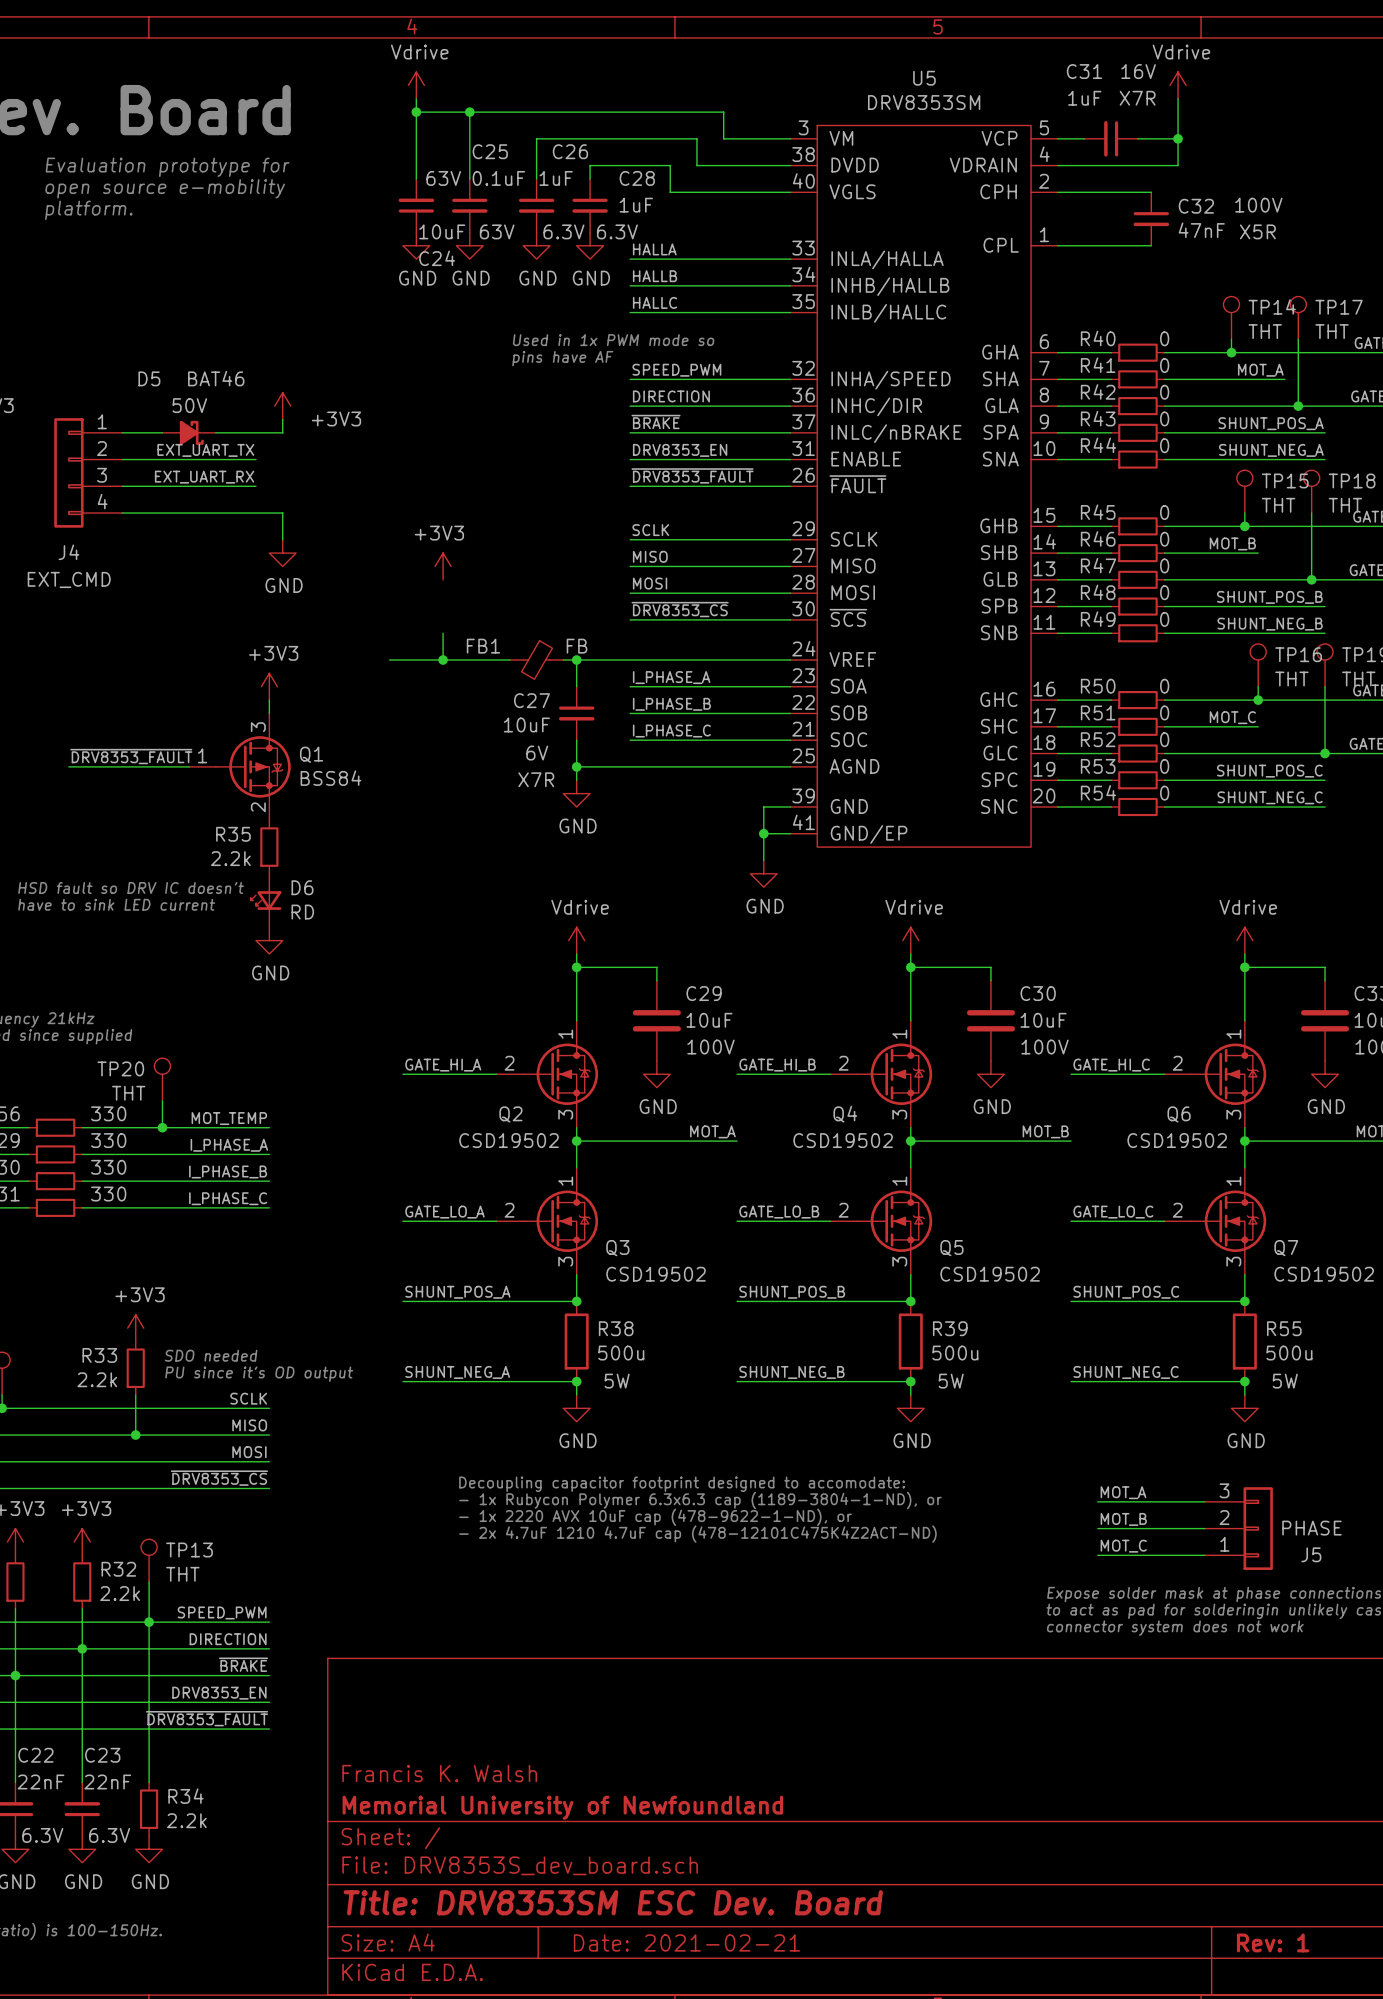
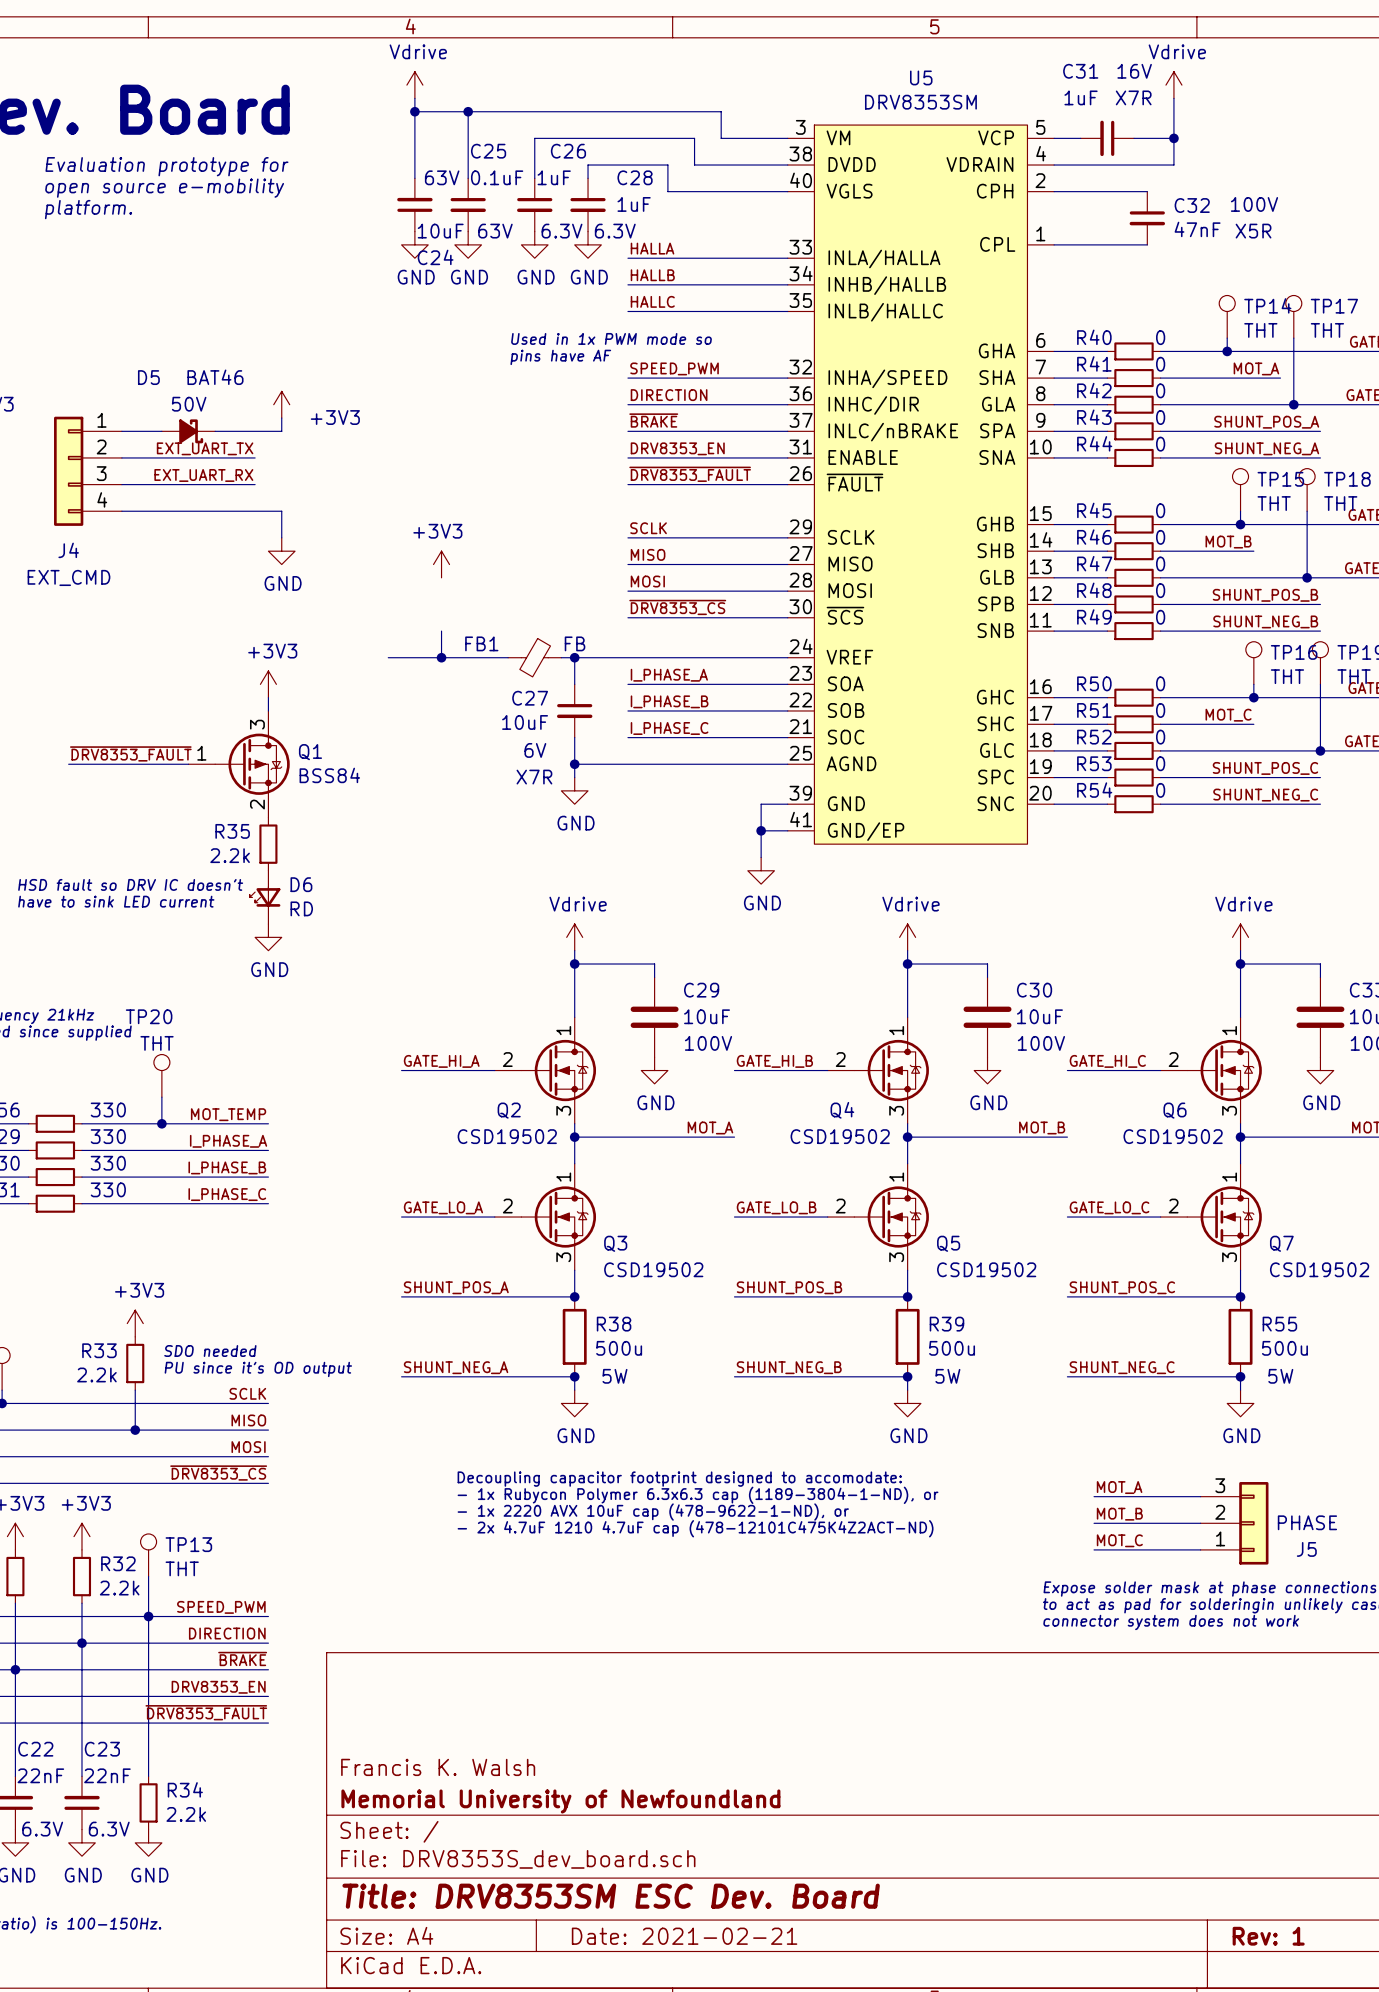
TP20 name position: TP20 (120, 1068) -> TP20 (149, 1016)
TP20 value position: THT (128, 1093) -> THT (157, 1043)

